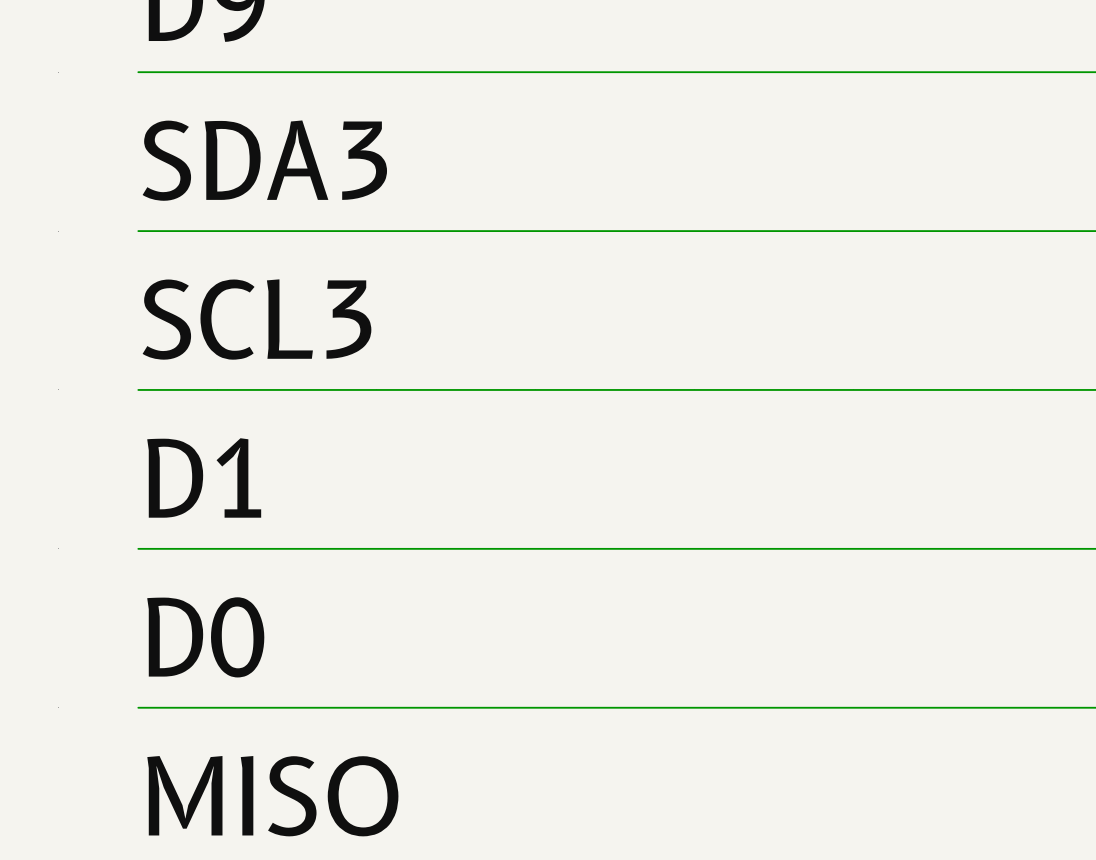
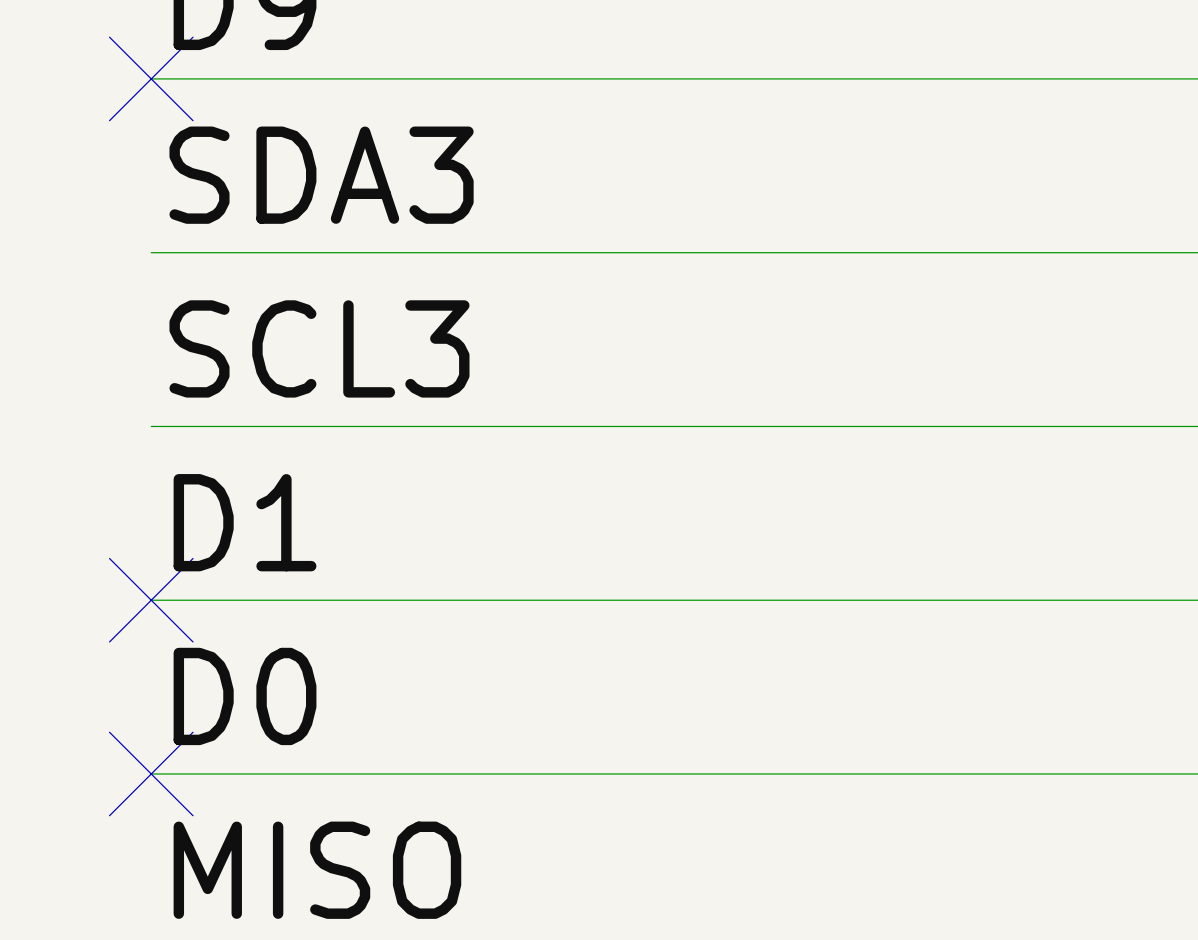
no-connect mark: none -> (151, 78)
no-connect mark: none -> (151, 600)
no-connect mark: none -> (151, 773)

